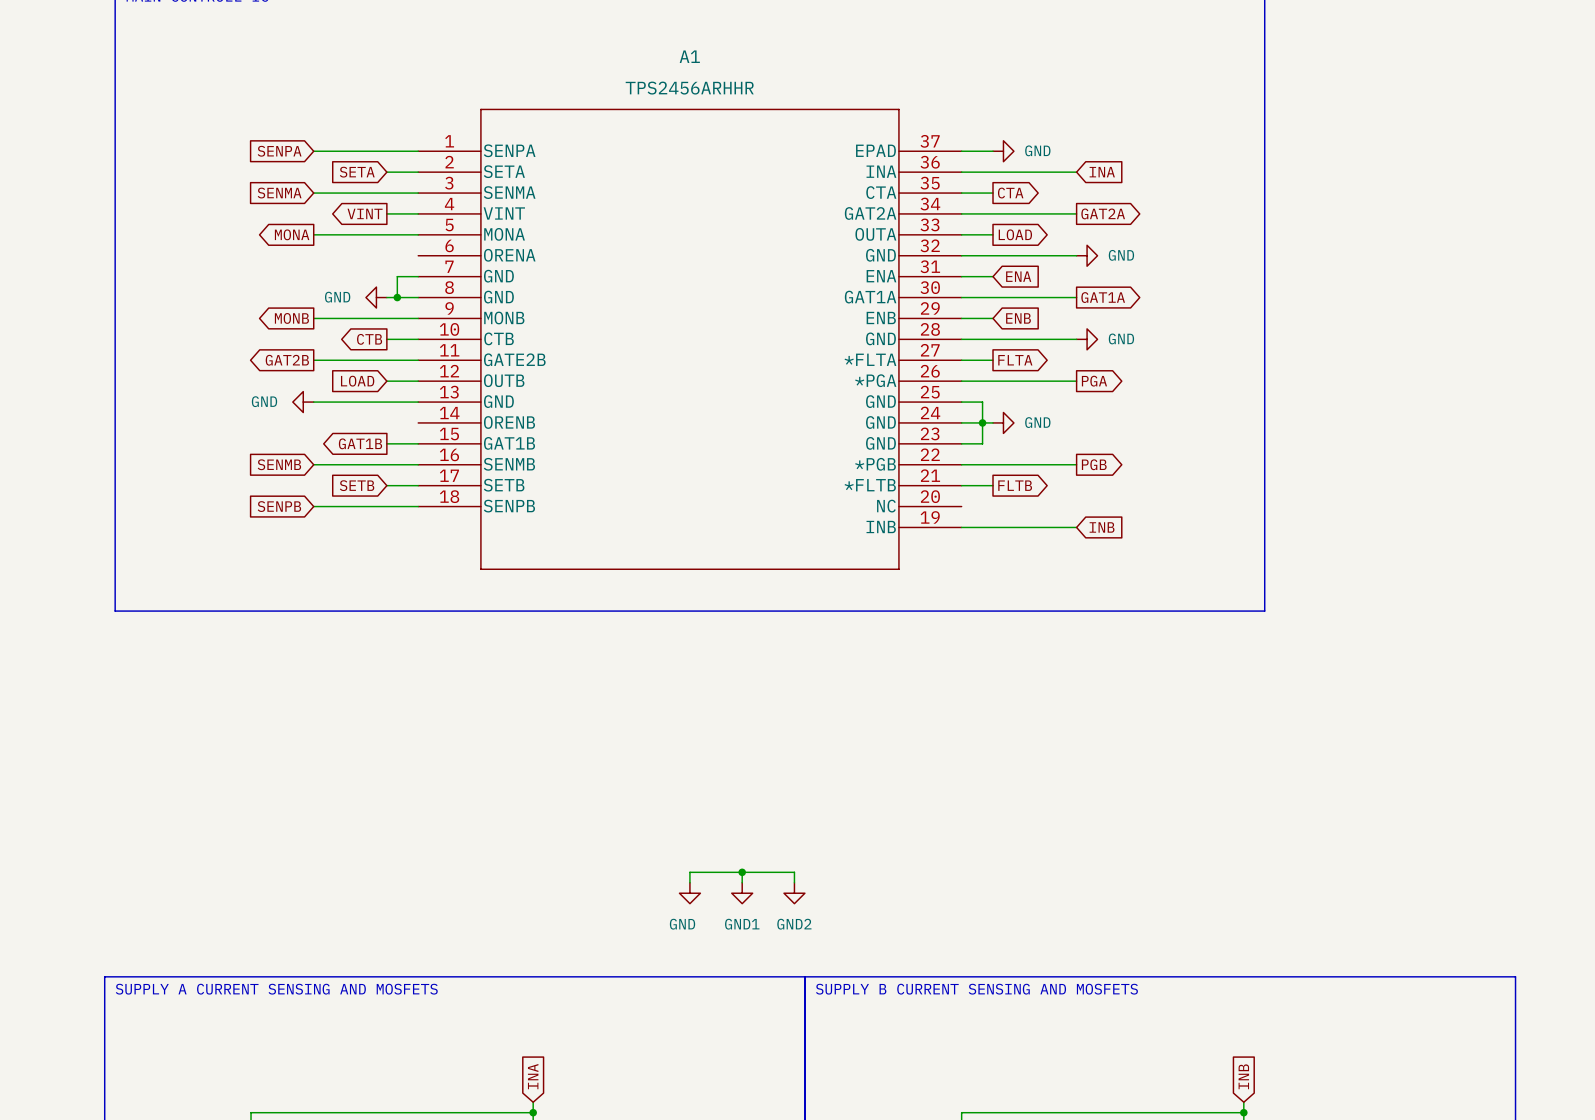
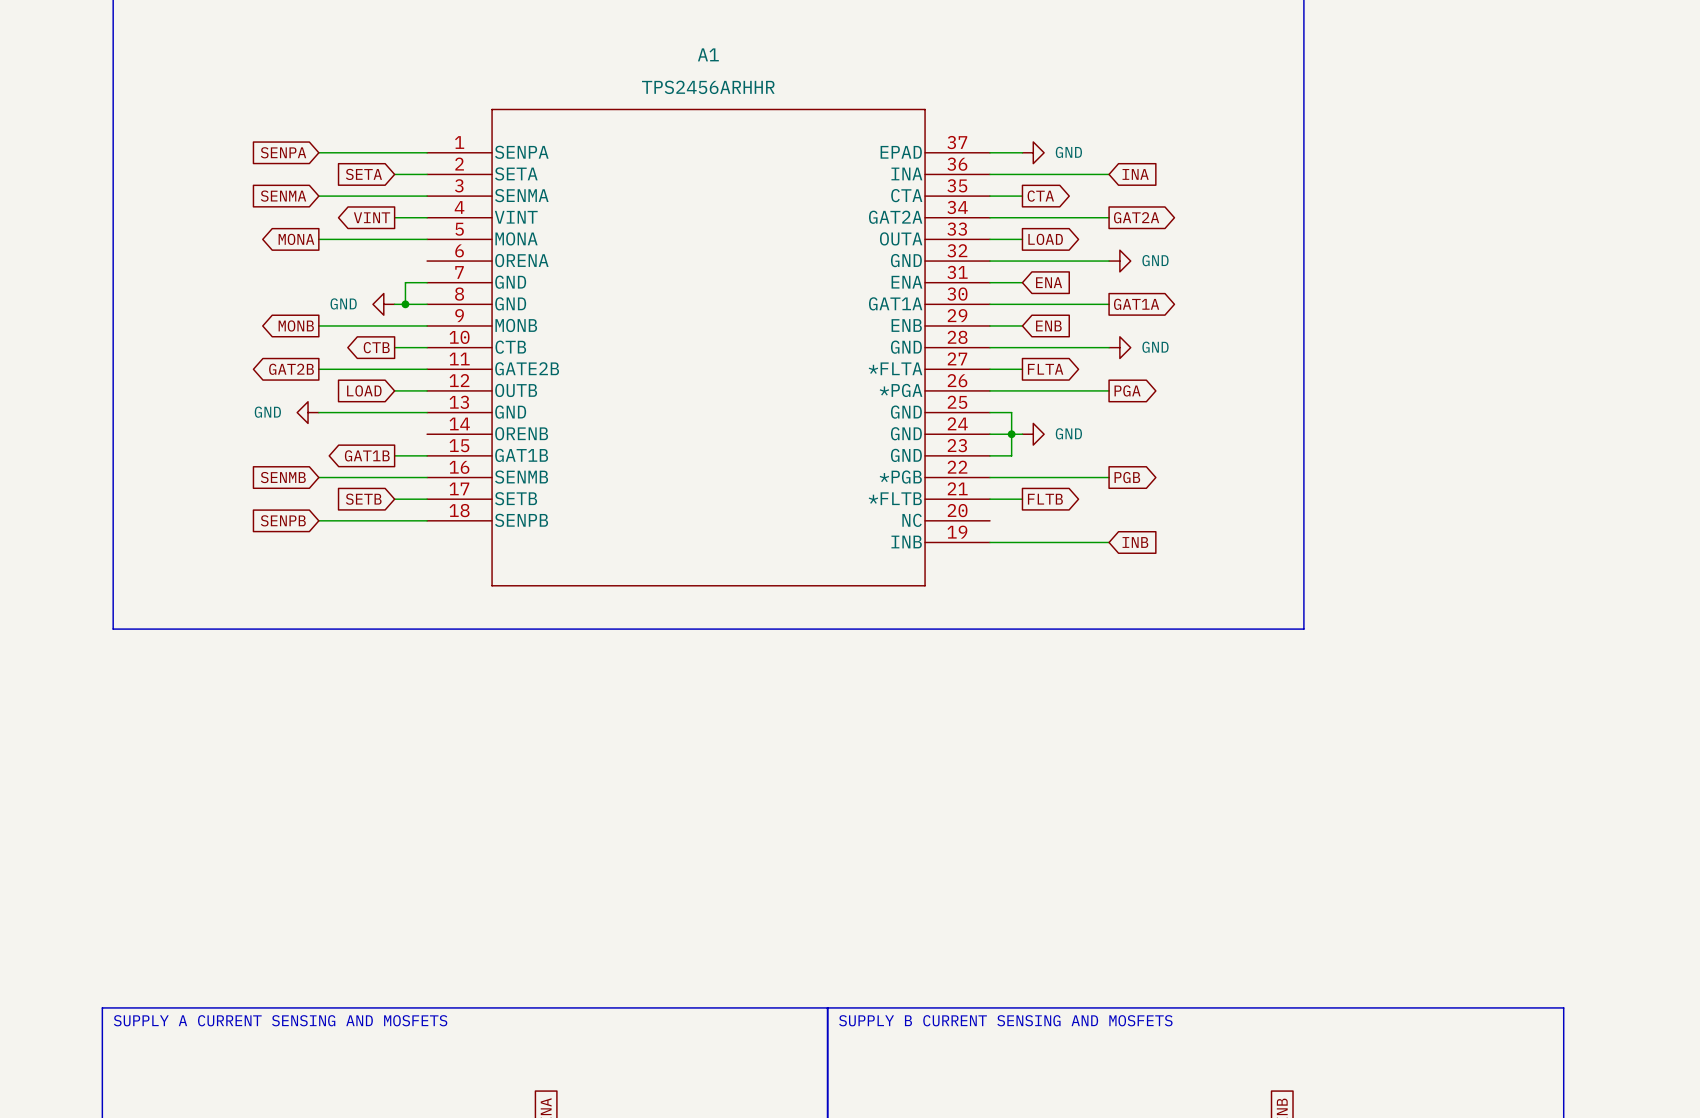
wire: (742, 872) (742, 882) -> none
junction: (742, 872) -> none
wire: (689, 882) (689, 872) (794, 872) (794, 882) -> none
power symbol: GND (689, 893) -> none
power symbol: GND1 (742, 893) -> none
power symbol: GND2 (794, 893) -> none

